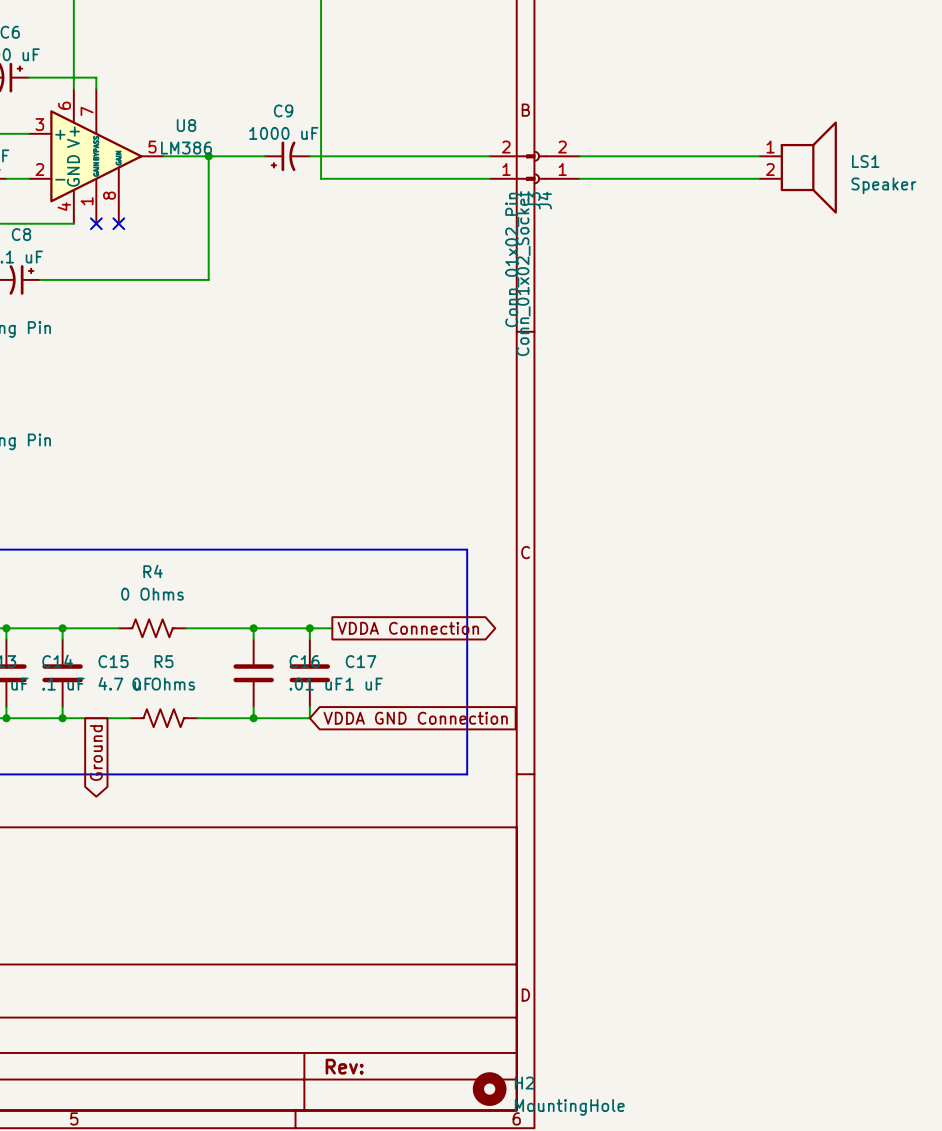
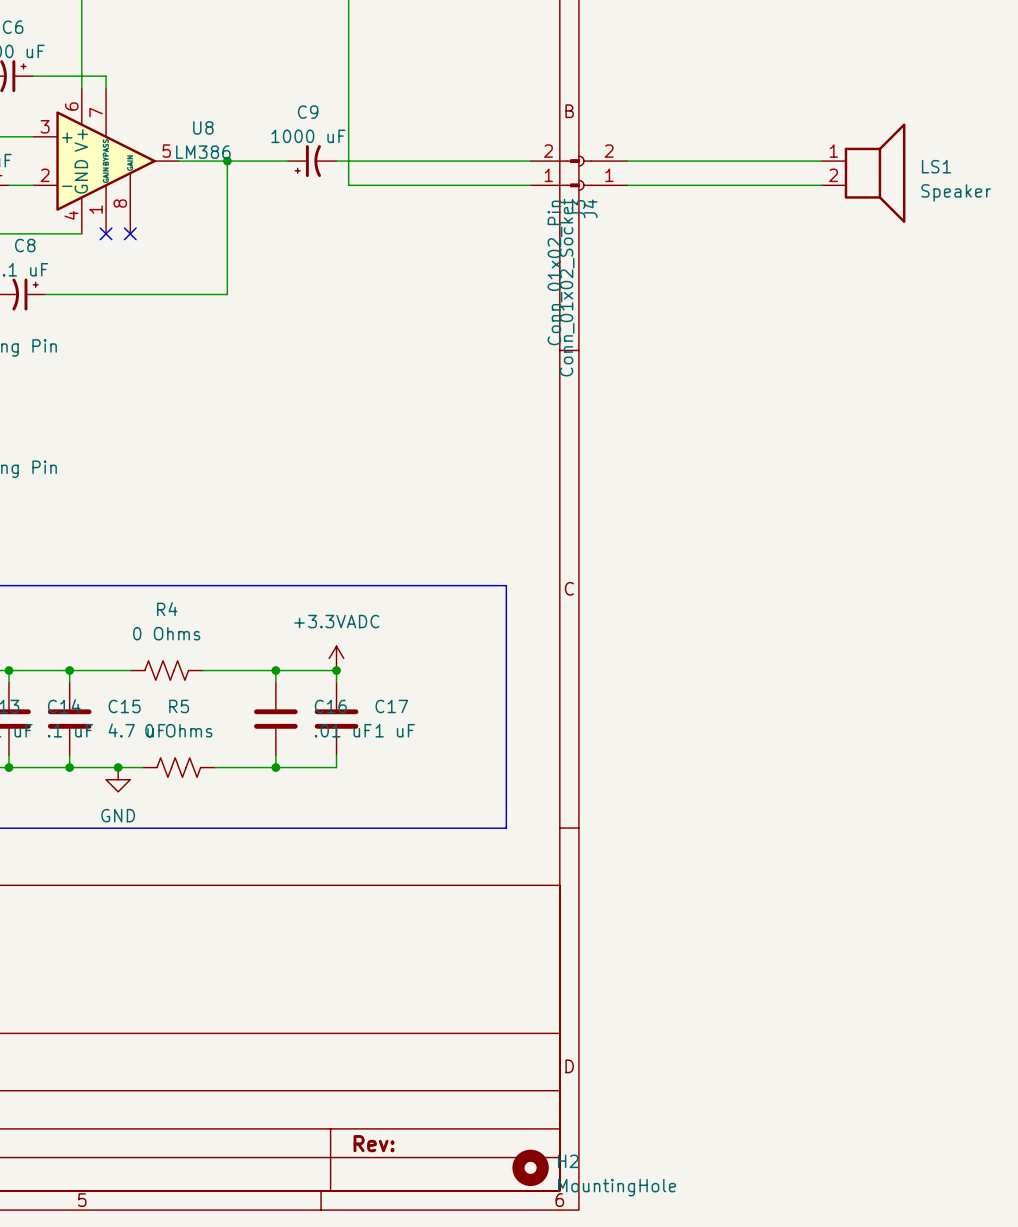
power symbol: none -> +3.3VADC (336, 658)
wire: (309, 628) (332, 628) -> none
global label: VDDA Connection (408, 628) -> none
junction: none -> (118, 767)
global label: VDDA GND Connection (415, 718) -> none
power symbol: none -> GND (118, 779)
global label: Ground (96, 753) -> none

